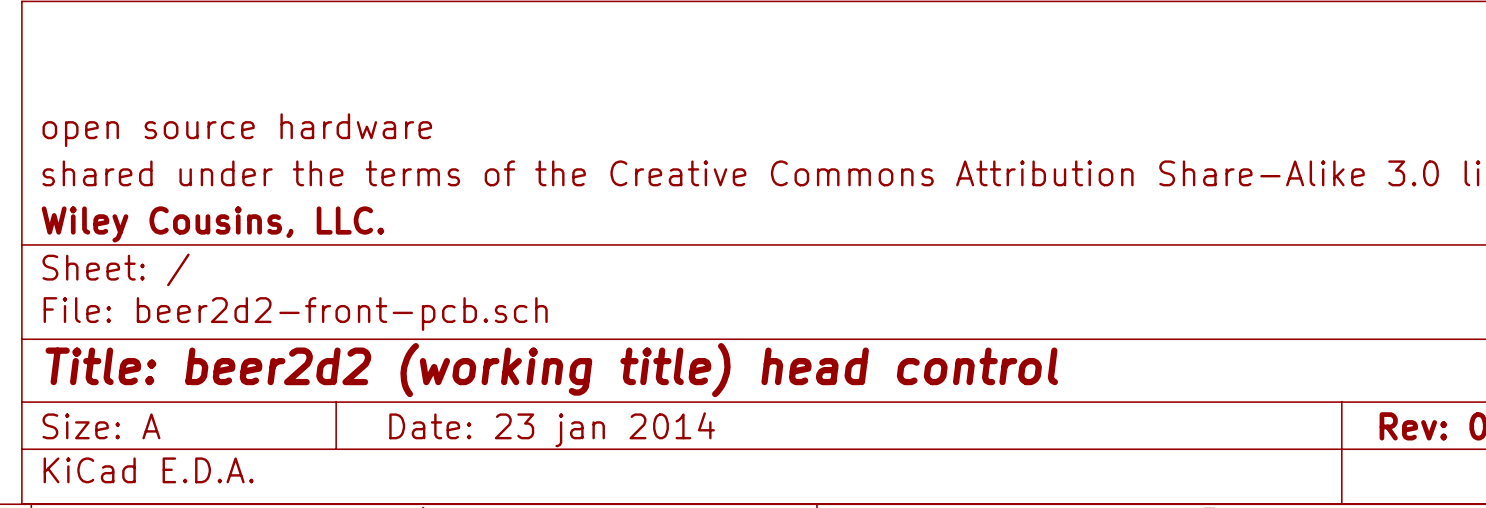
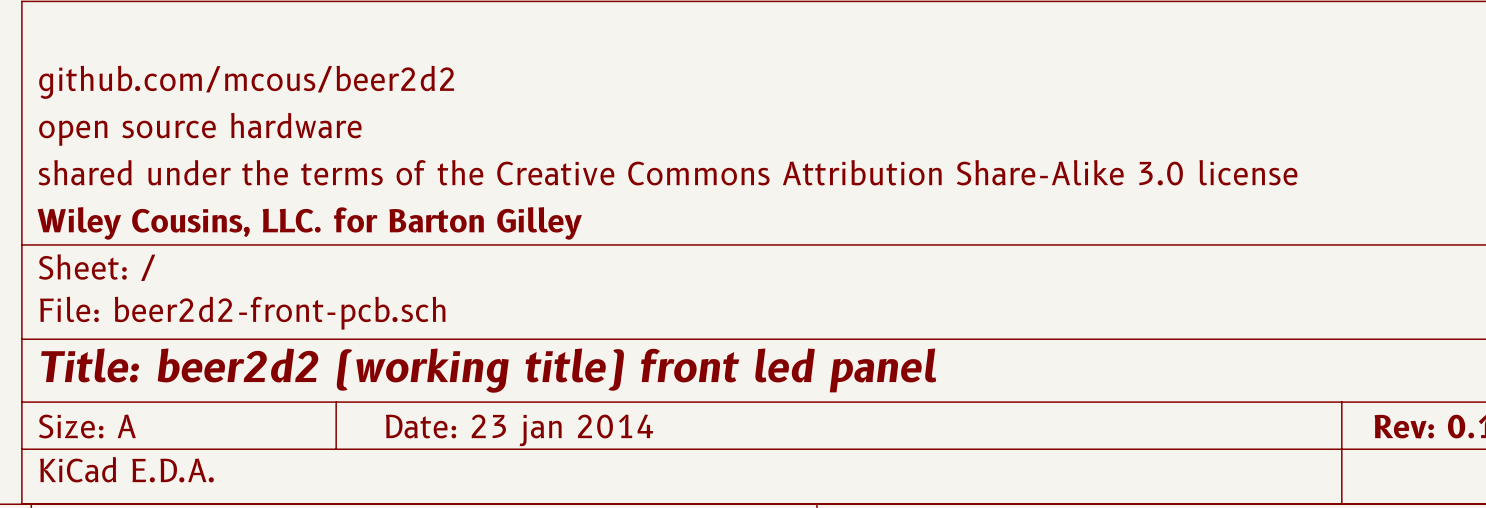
title block: none -> github.com/mcous/beer2d2 (246, 82)
title block: Wiley Cousins, LLC. (212, 224) -> Wiley Cousins, LLC. for Barton Gilley (309, 223)
title block: Title: beer2d2 (working title) head control (551, 370) -> Title: beer2d2 (working title) front led panel (488, 370)

